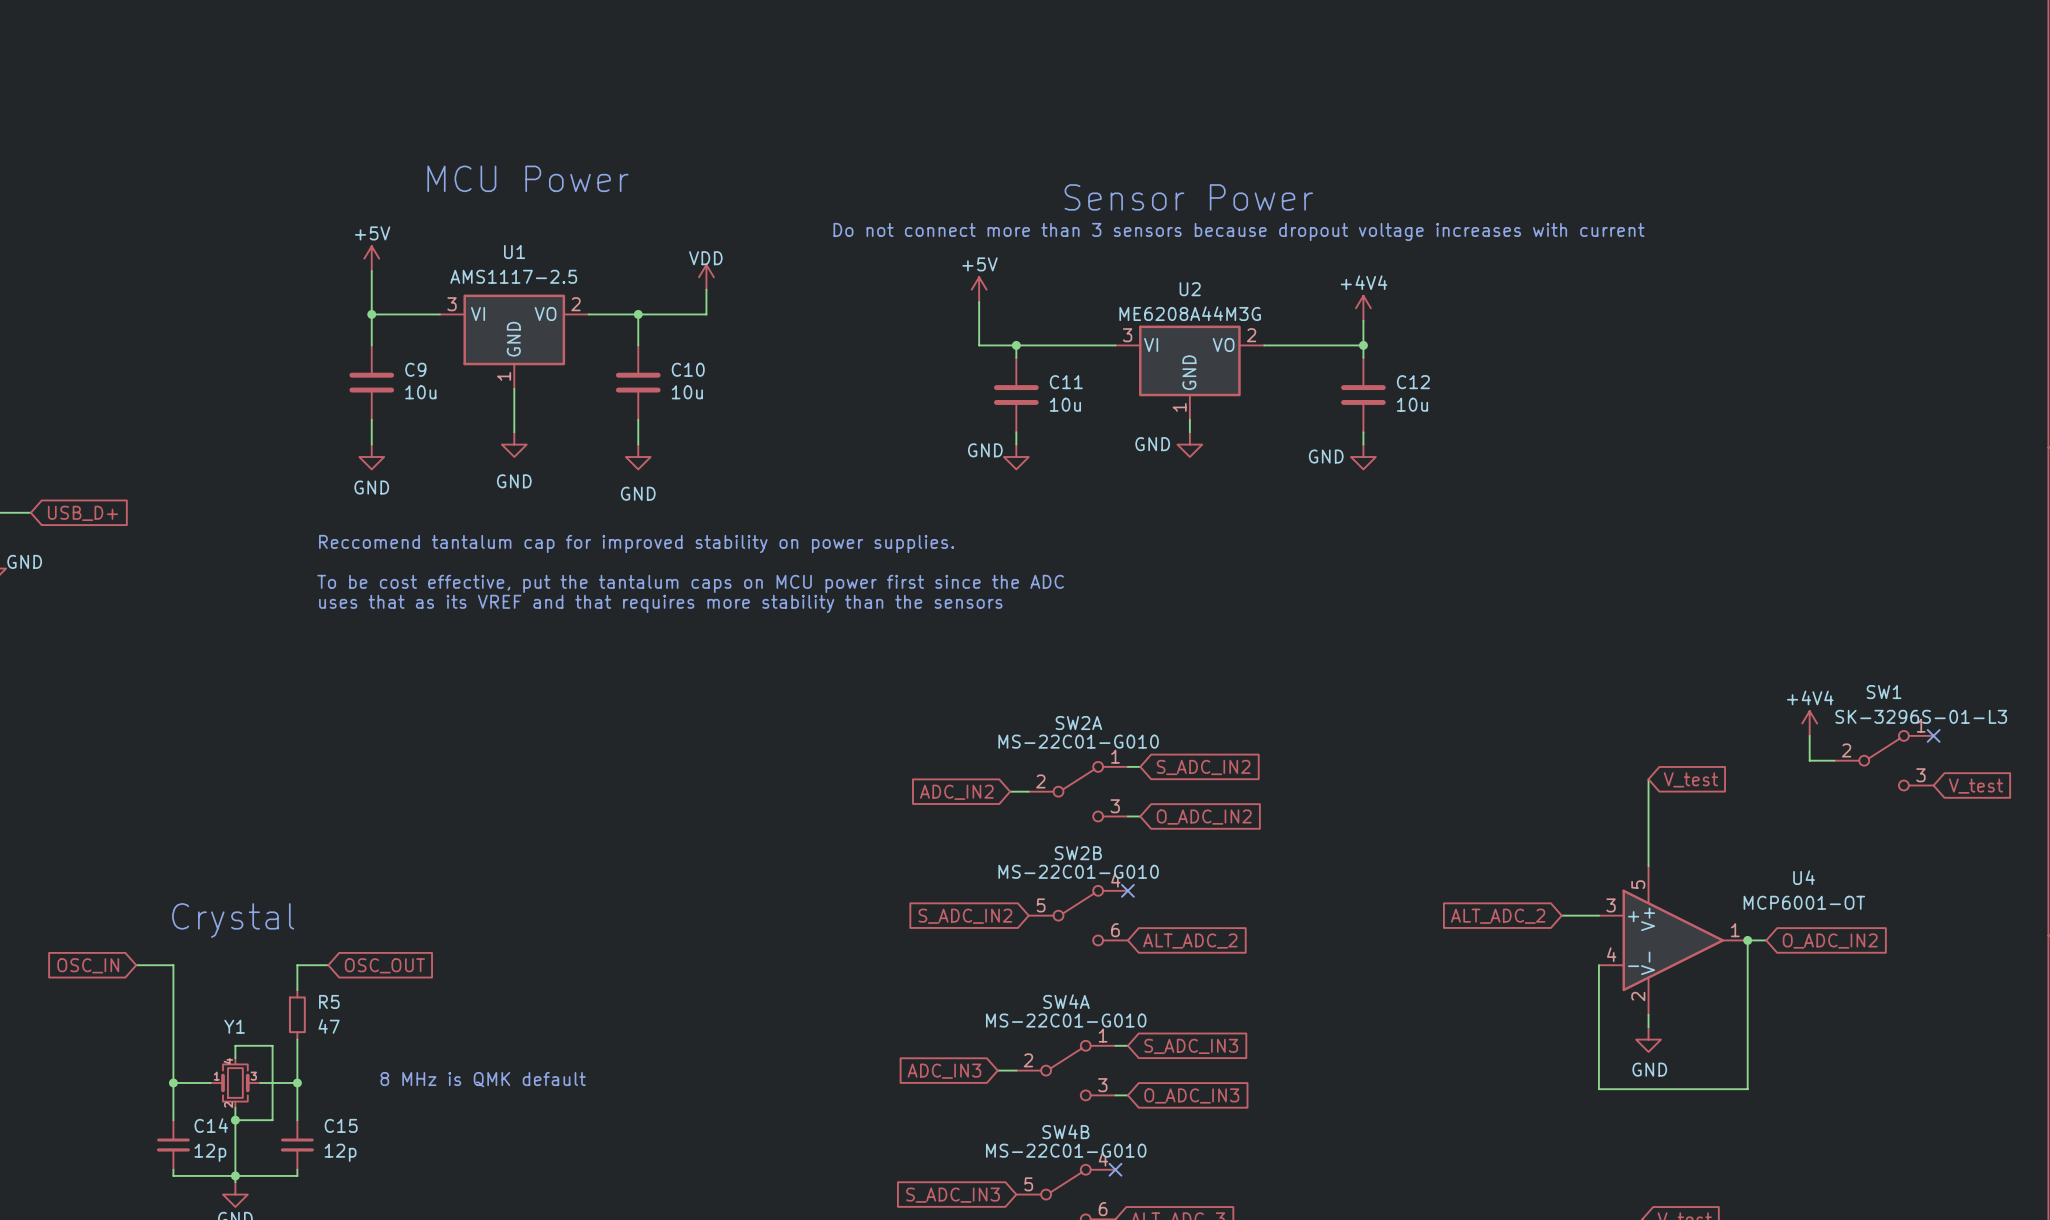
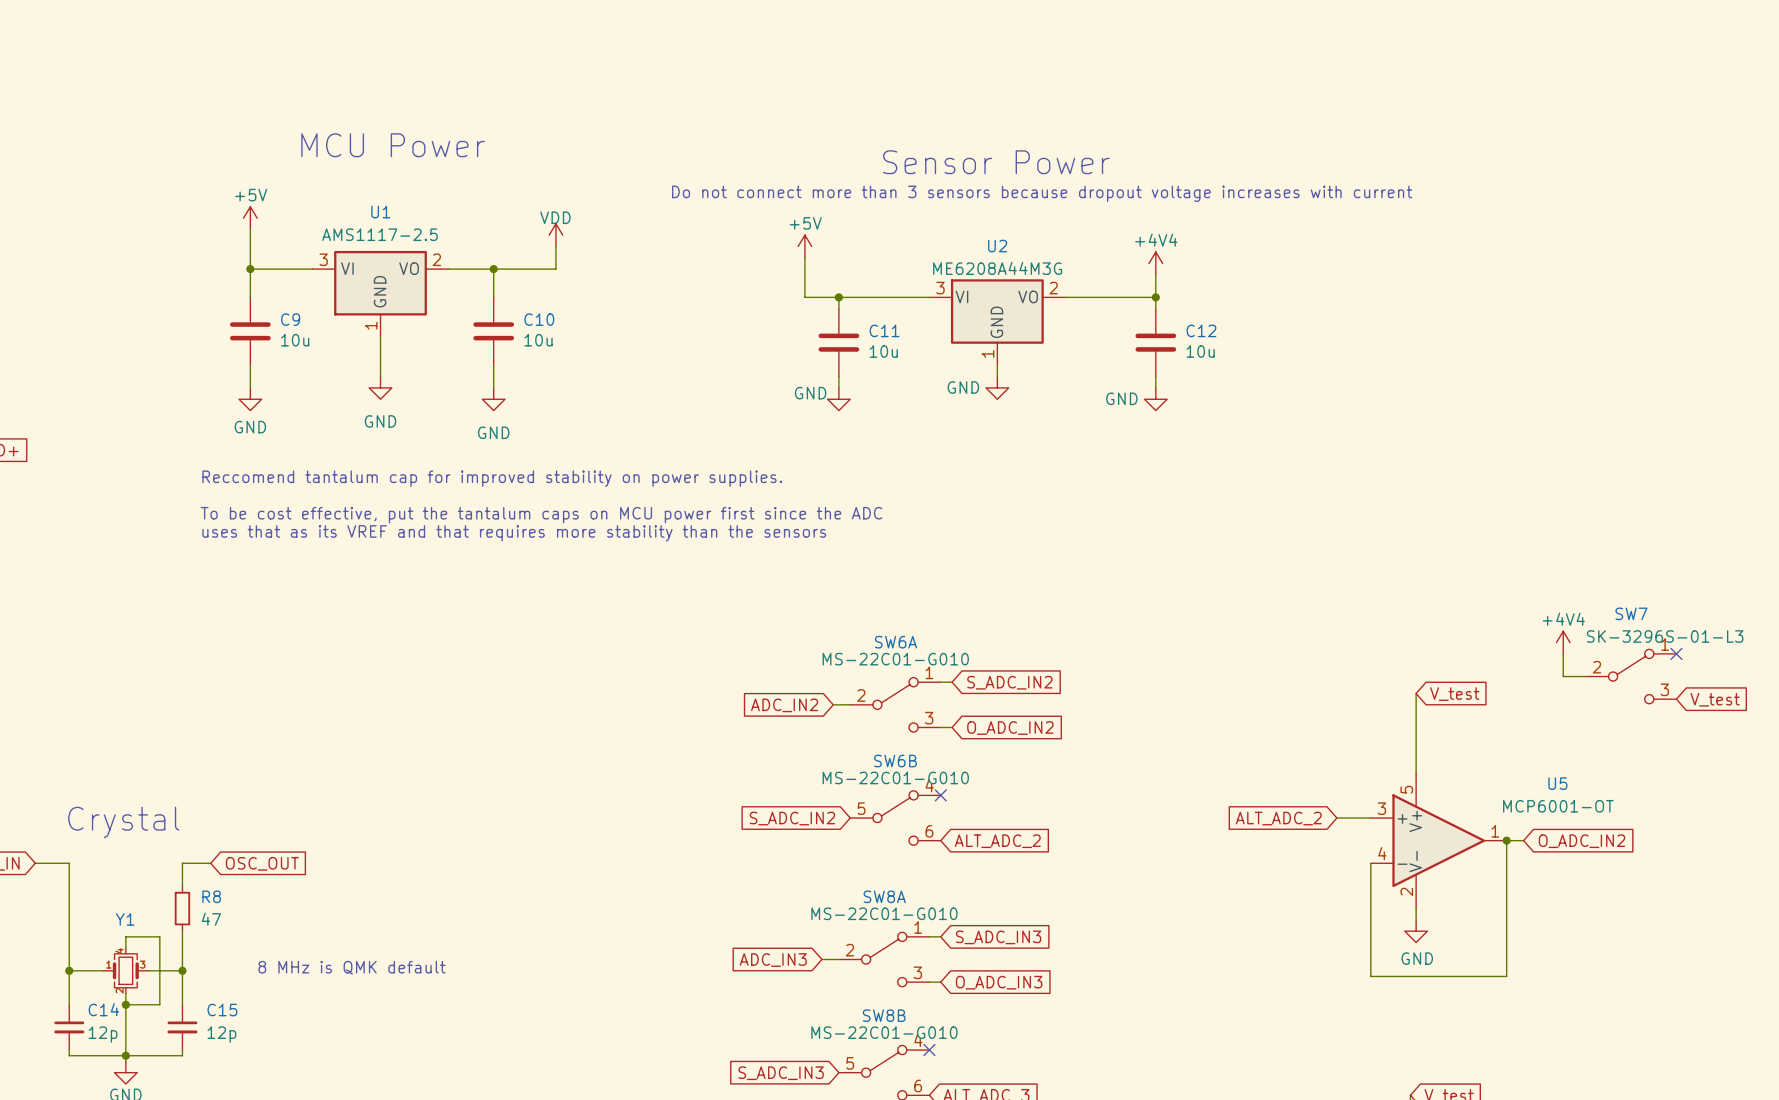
SW1 name: SW1 (1884, 692) -> SW7 (1631, 613)
SW2A name: SW2A (1078, 723) -> SW6A (896, 642)
SW2B name: SW2B (1078, 853) -> SW6B (895, 761)
U4 name: U4 (1804, 877) -> U5 (1557, 783)
R5 name: R5 (329, 1001) -> R8 (211, 896)
SW4A name: SW4A (1066, 1001) -> SW8A (884, 896)
SW4B name: SW4B (1065, 1131) -> SW8B (884, 1015)

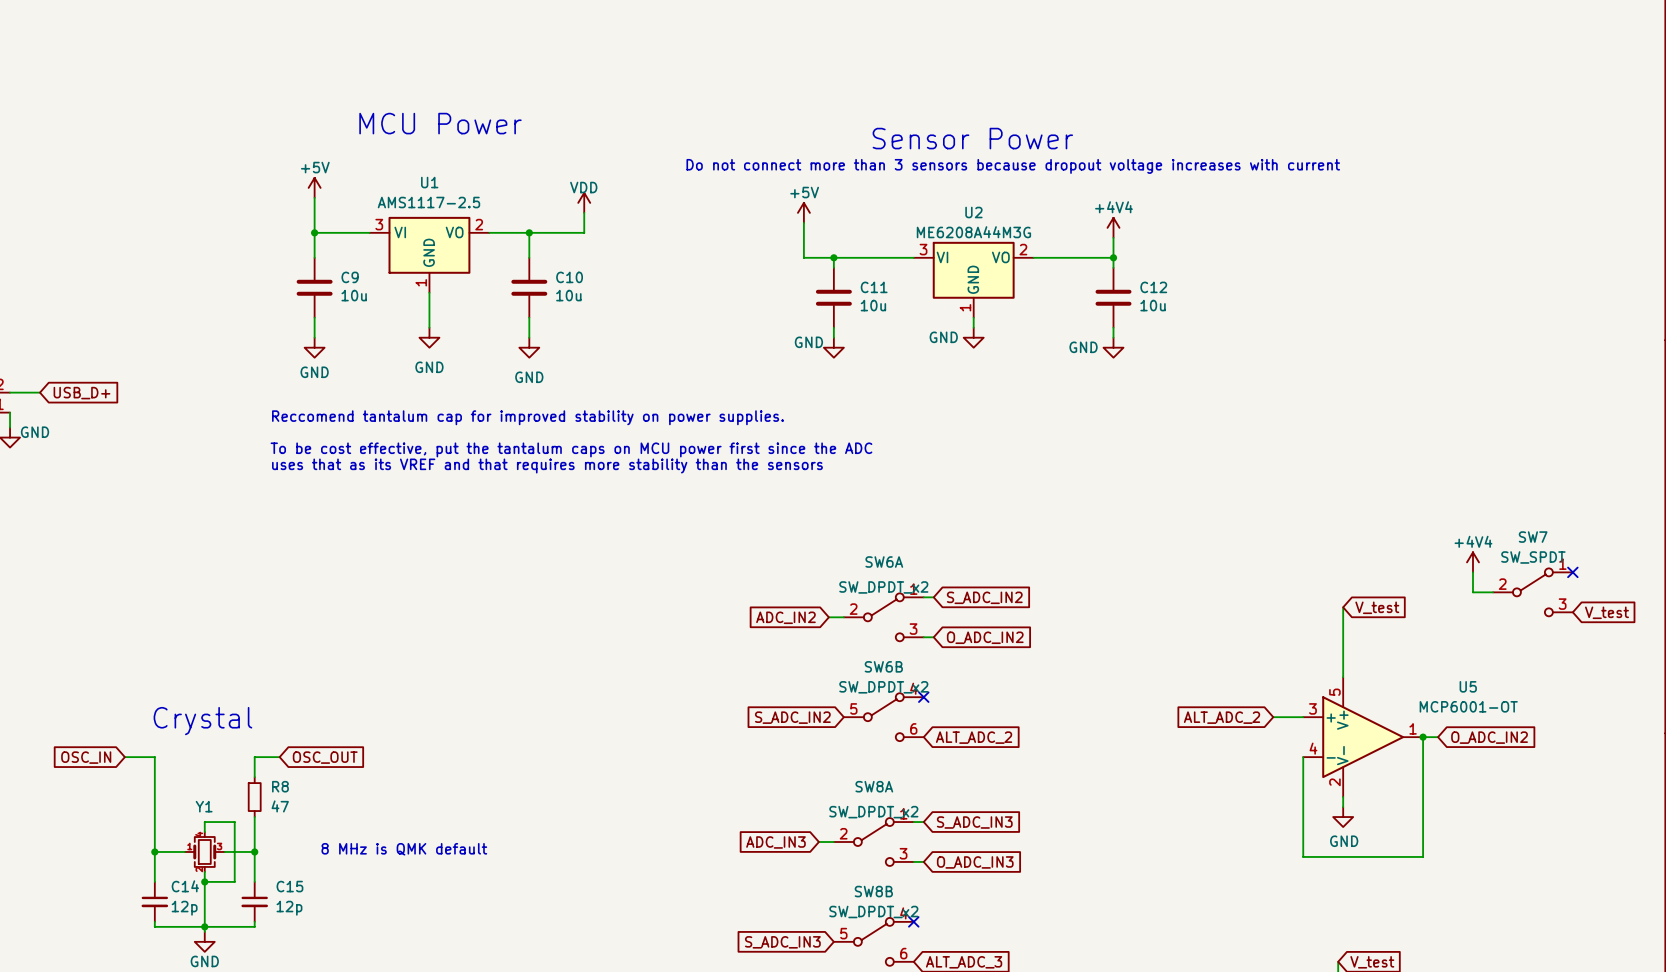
SW7 value: SK-3296S-01-L3 (1665, 636) -> SW_SPDT (1533, 557)
SW6A value: MS-22C01-G010 (895, 659) -> SW_DPDT_x2 (883, 587)
SW6B value: MS-22C01-G010 (895, 777) -> SW_DPDT_x2 (883, 687)
SW8A value: MS-22C01-G010 (884, 913) -> SW_DPDT_x2 (873, 812)
SW8B value: MS-22C01-G010 (884, 1032) -> SW_DPDT_x2 (873, 912)

